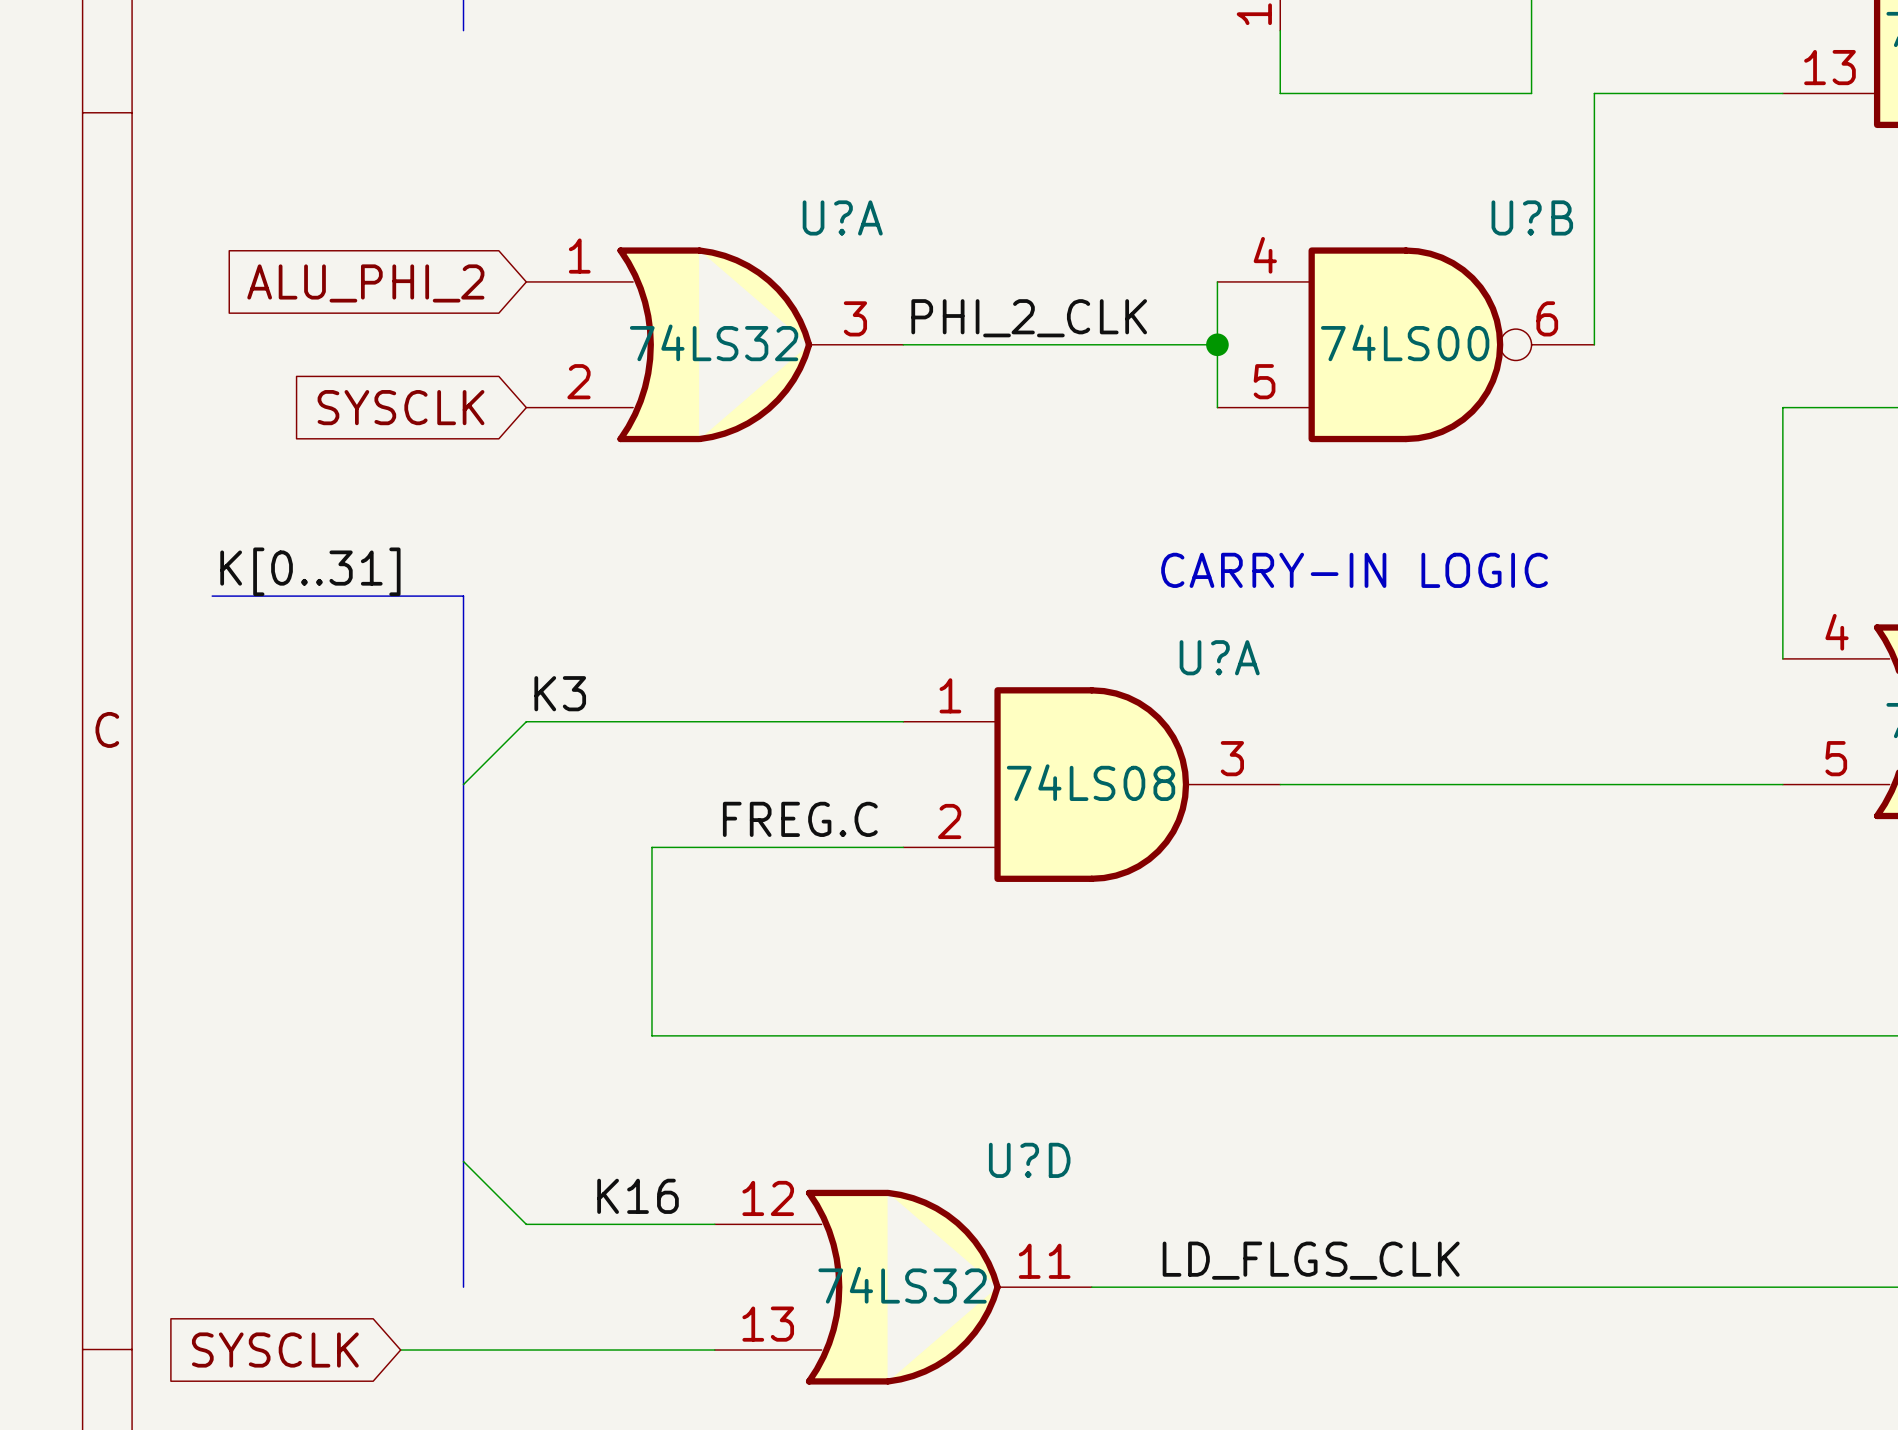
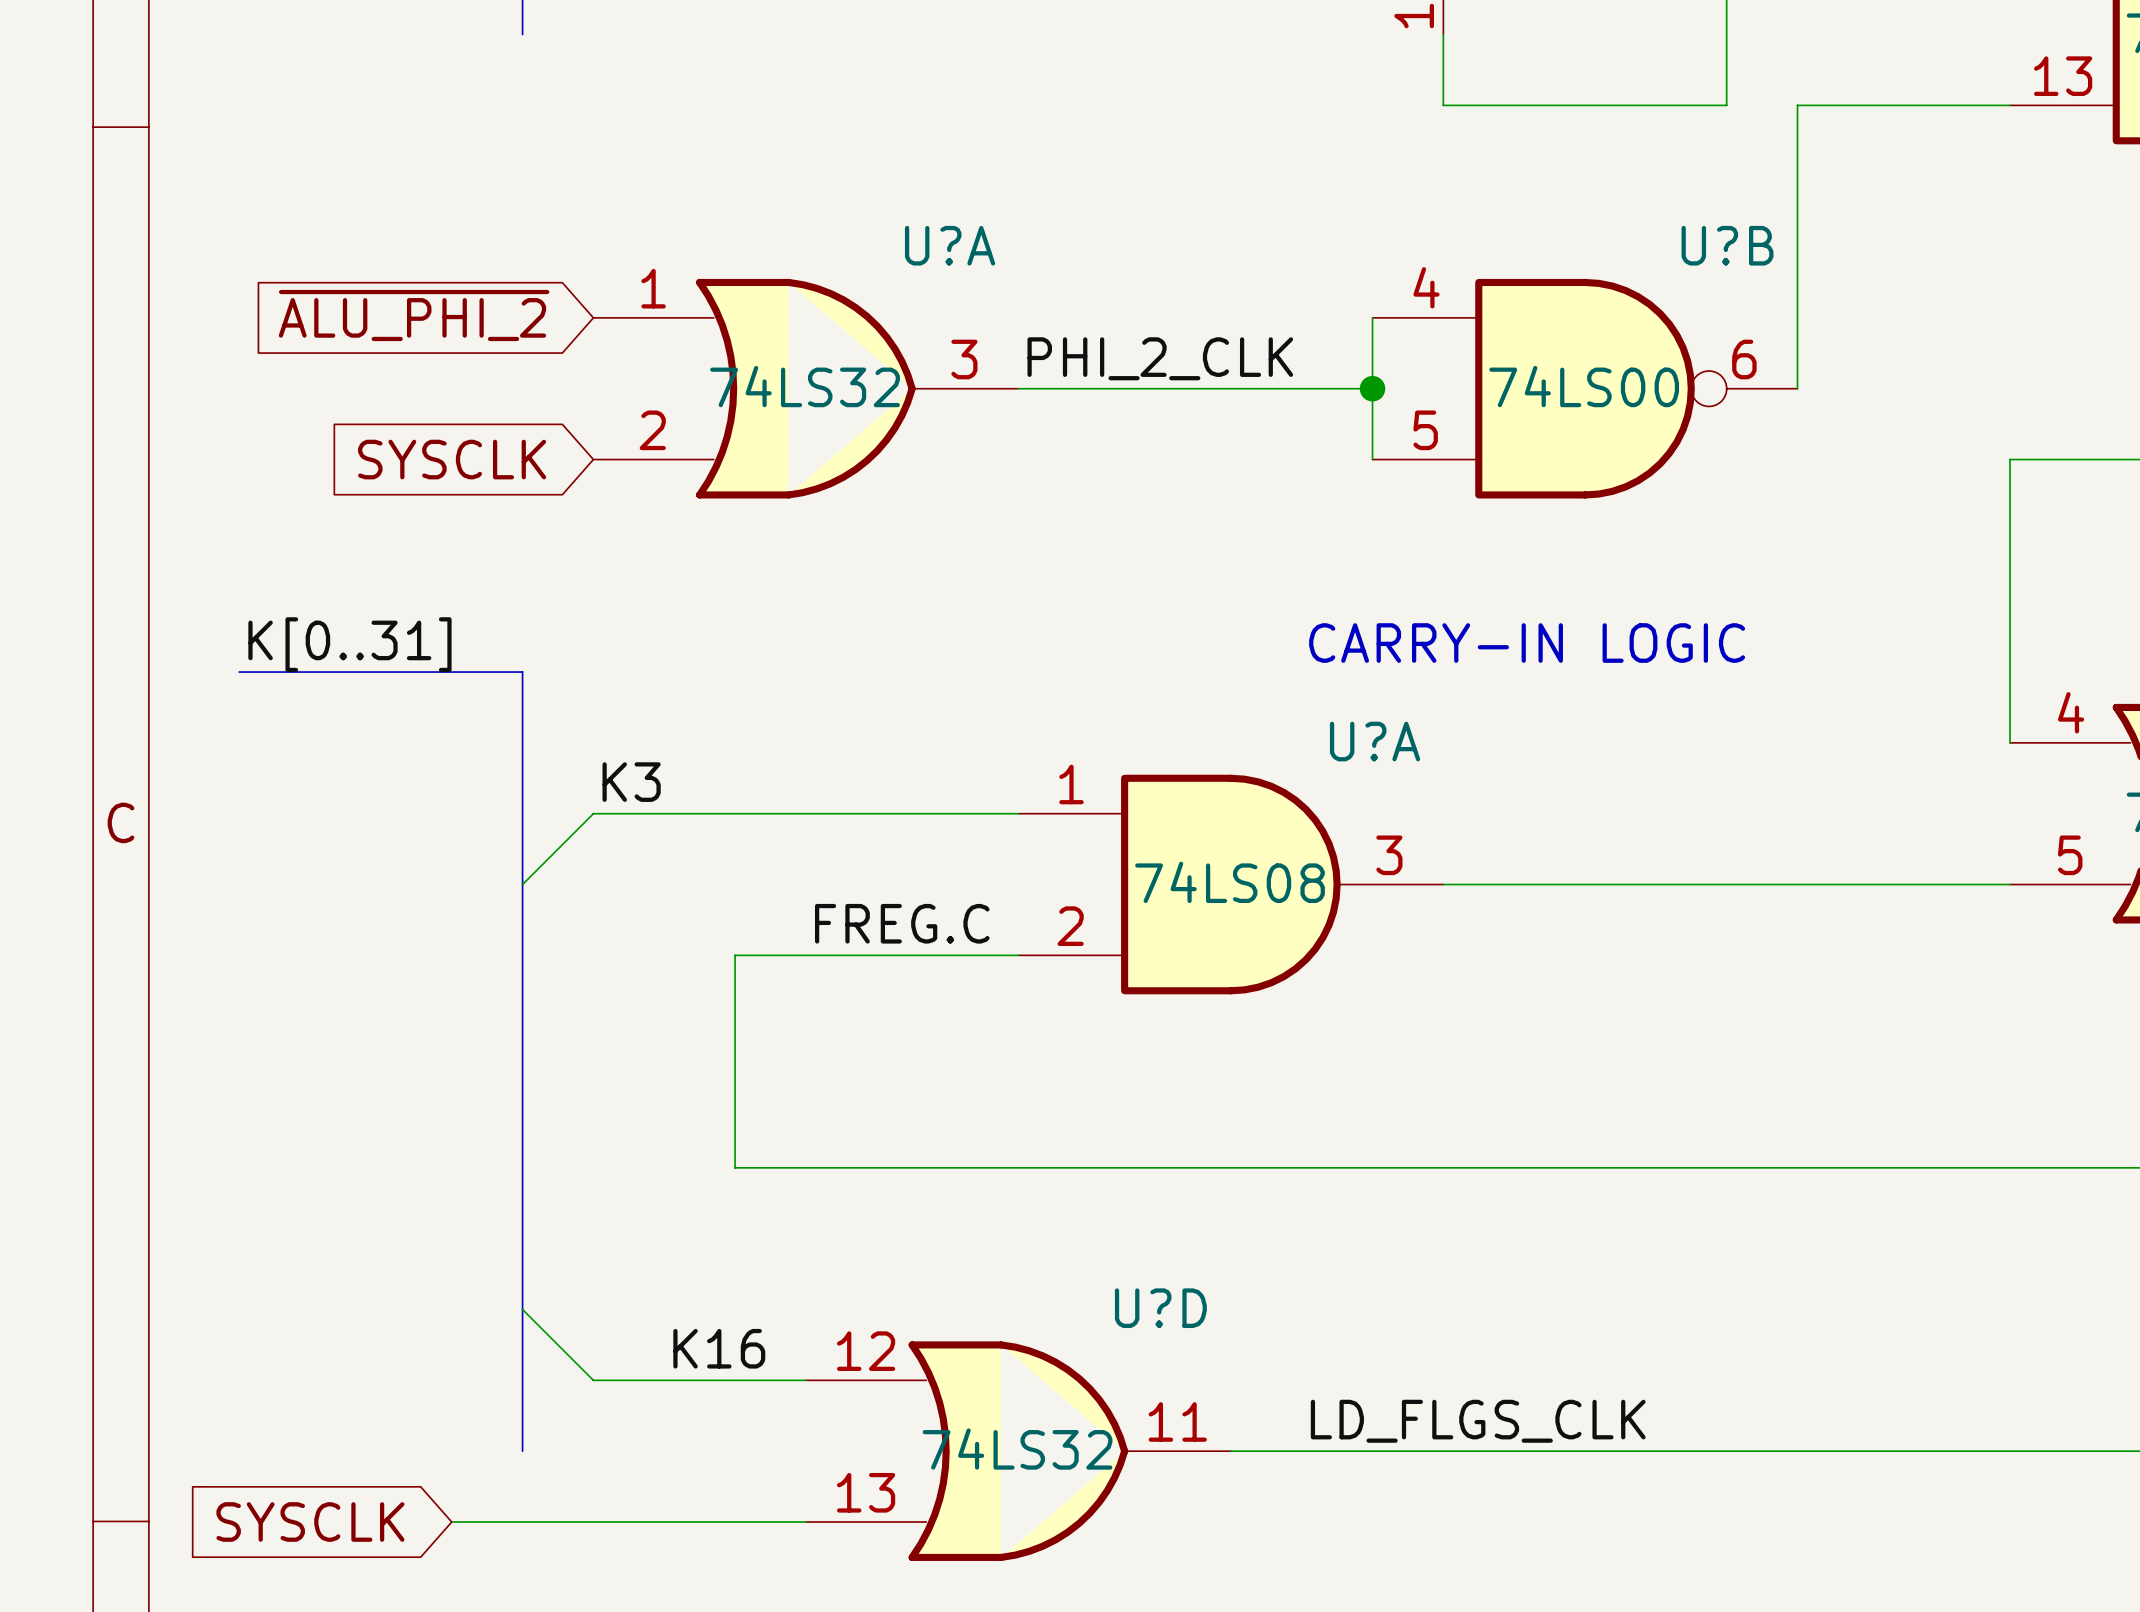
global label: ALU_PHI_2 (365, 283) -> ~{ALU_PHI_2} (414, 315)

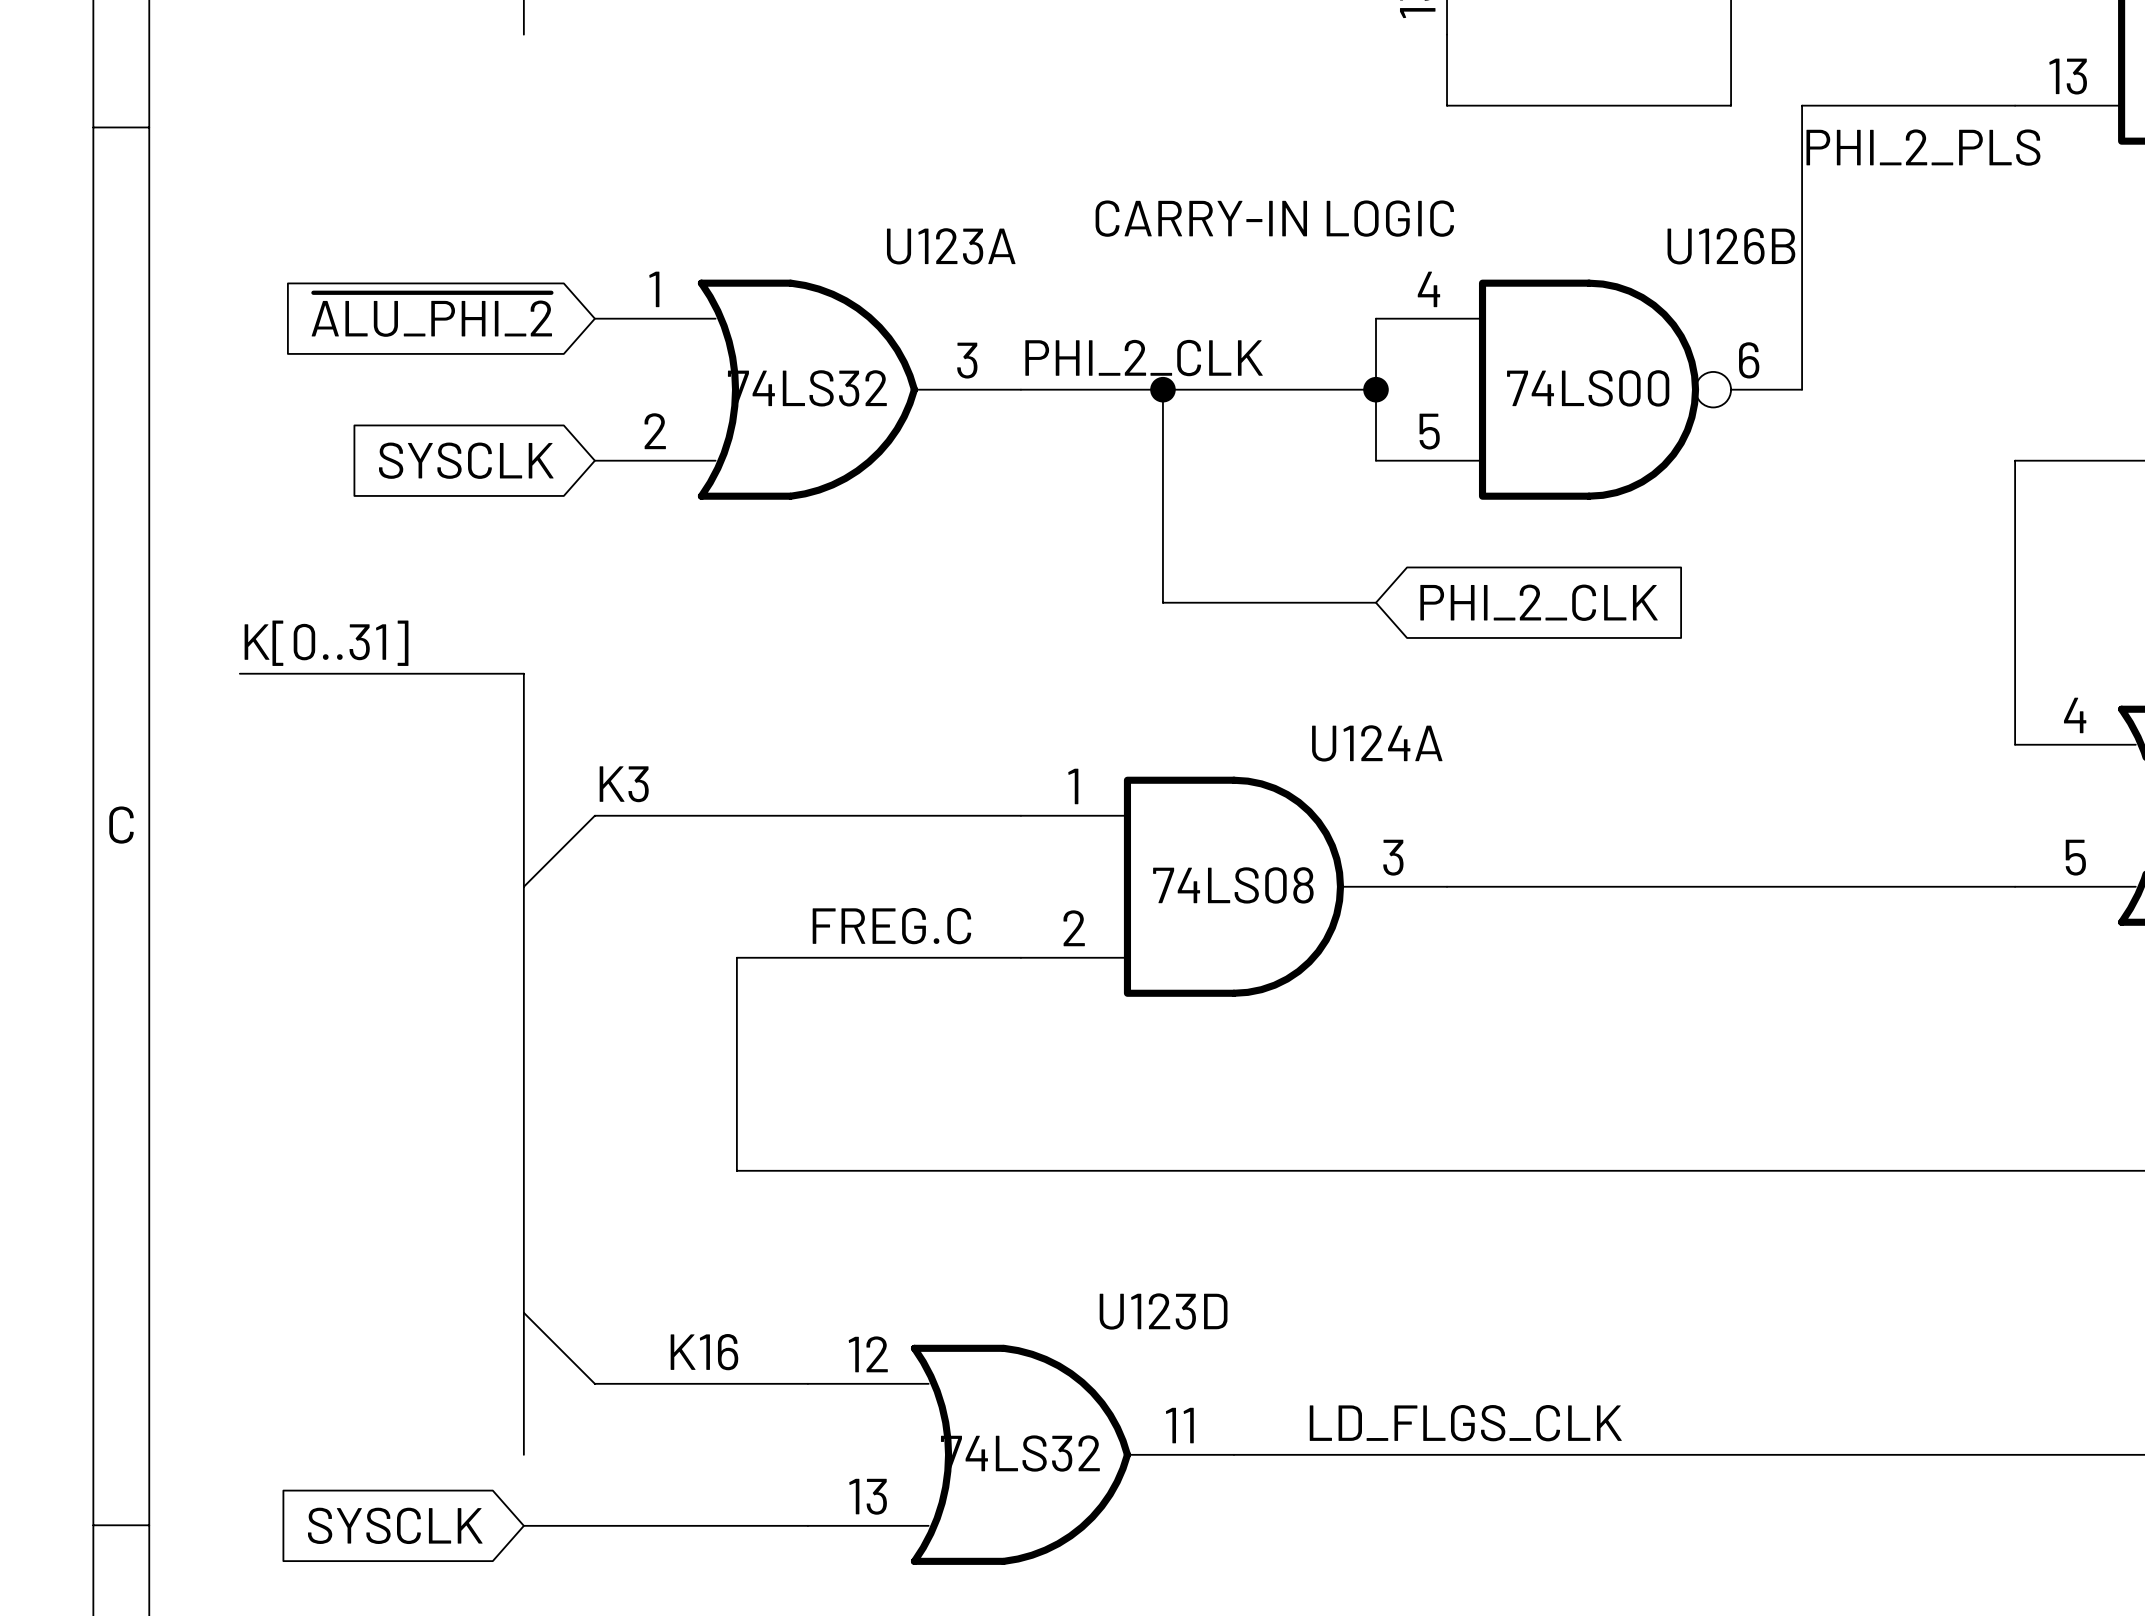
text: none -> PHI_2_PLS (1923, 147)
U?A name: U?A (950, 245) -> U123A (951, 246)
U?B name: U?B (1727, 245) -> U126B (1731, 246)
wire: none -> (1162, 389) (1162, 602) (1376, 602)
junction: none -> (1162, 389)
global label: none -> PHI_2_CLK (1539, 602)
text position: CARRY-IN LOGIC (1527, 643) -> CARRY-IN LOGIC (1274, 218)
U?A name: U?A (1375, 741) -> U124A (1377, 743)
U?D name: U?D (1160, 1308) -> U123D (1163, 1311)
global label position: SYSCLK (310, 1522) -> SYSCLK (395, 1525)
wire: (451, 1522) (522, 1522) -> none

